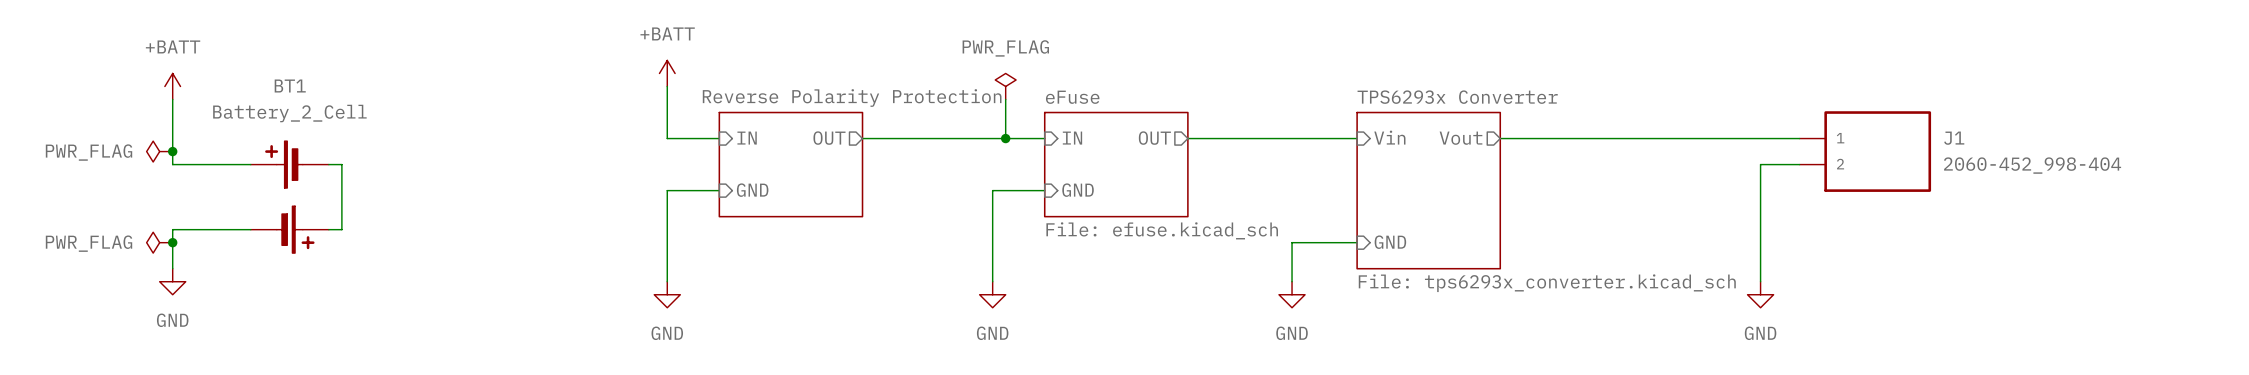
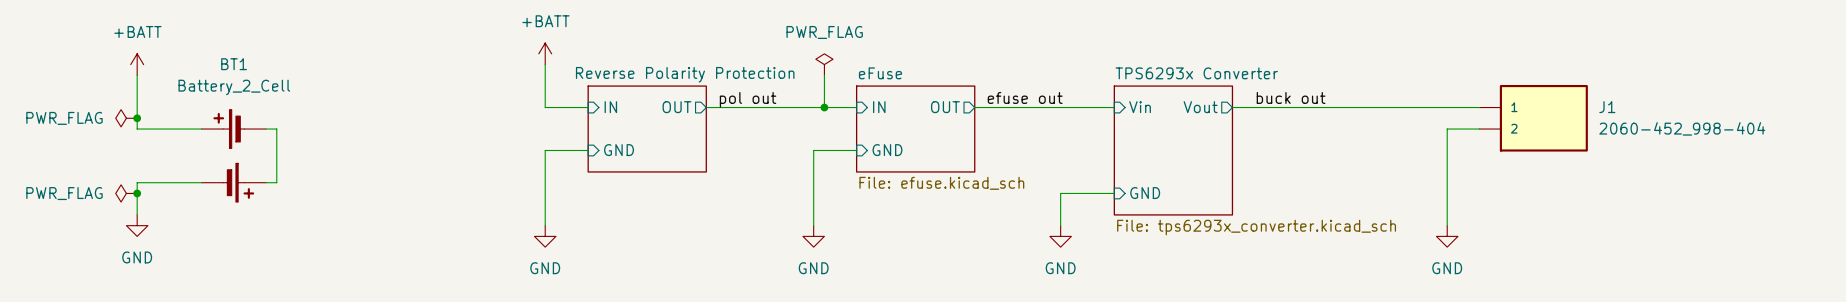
label: none -> efuse out (1025, 97)
label: none -> buck out (1291, 97)
label: none -> pol out (748, 99)

